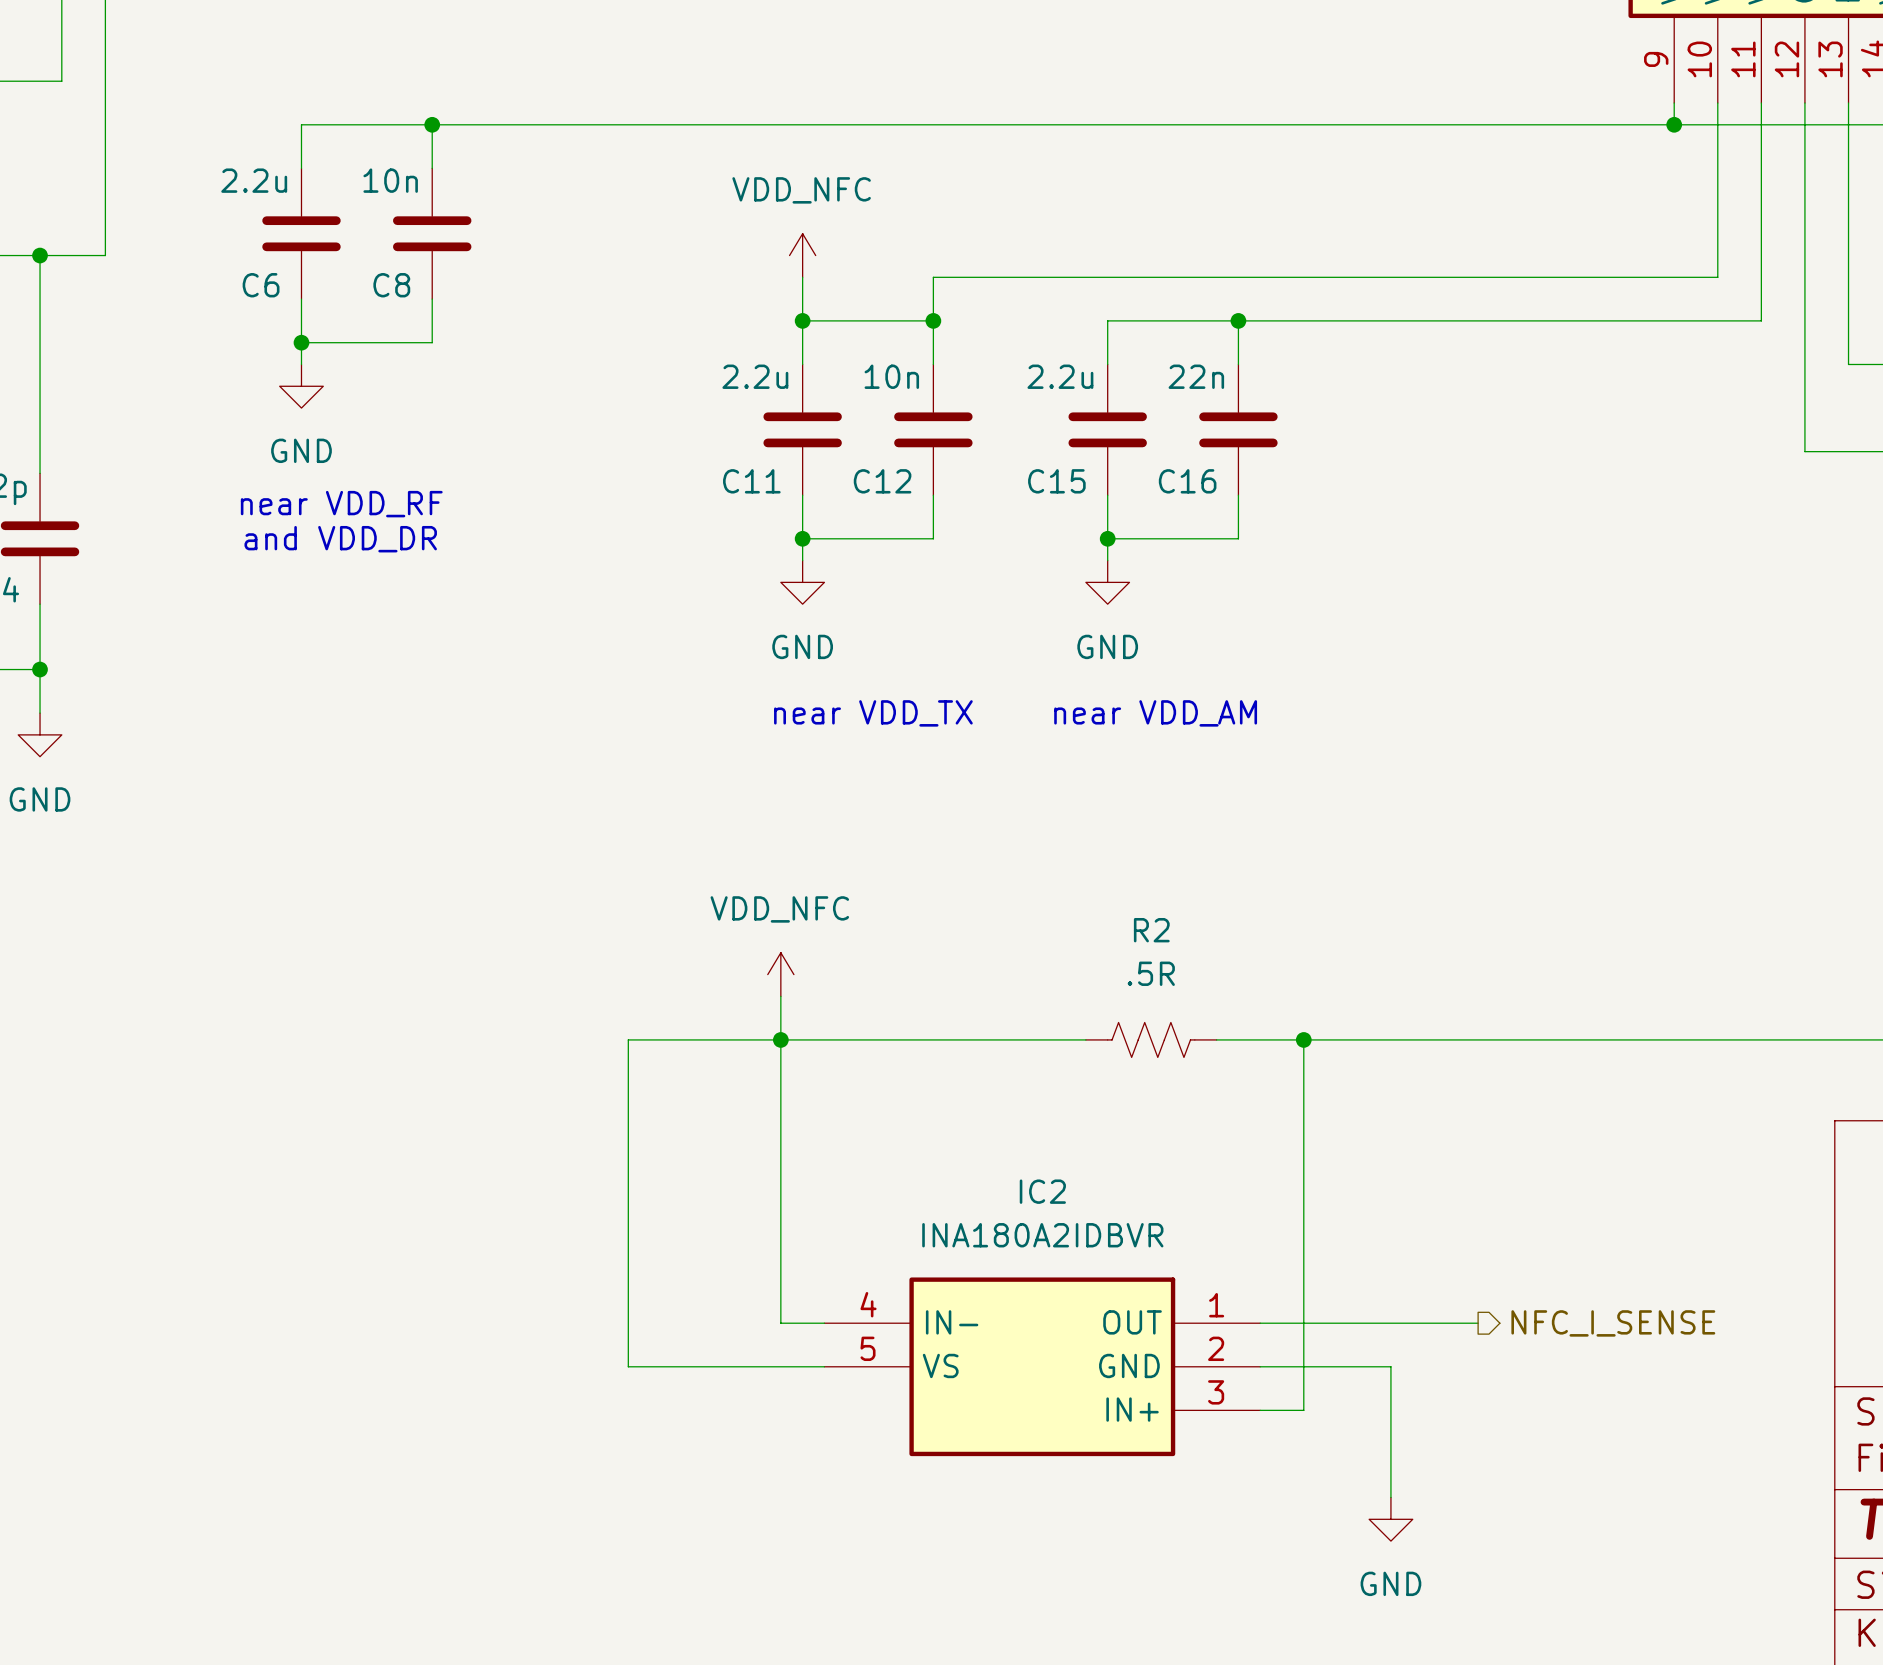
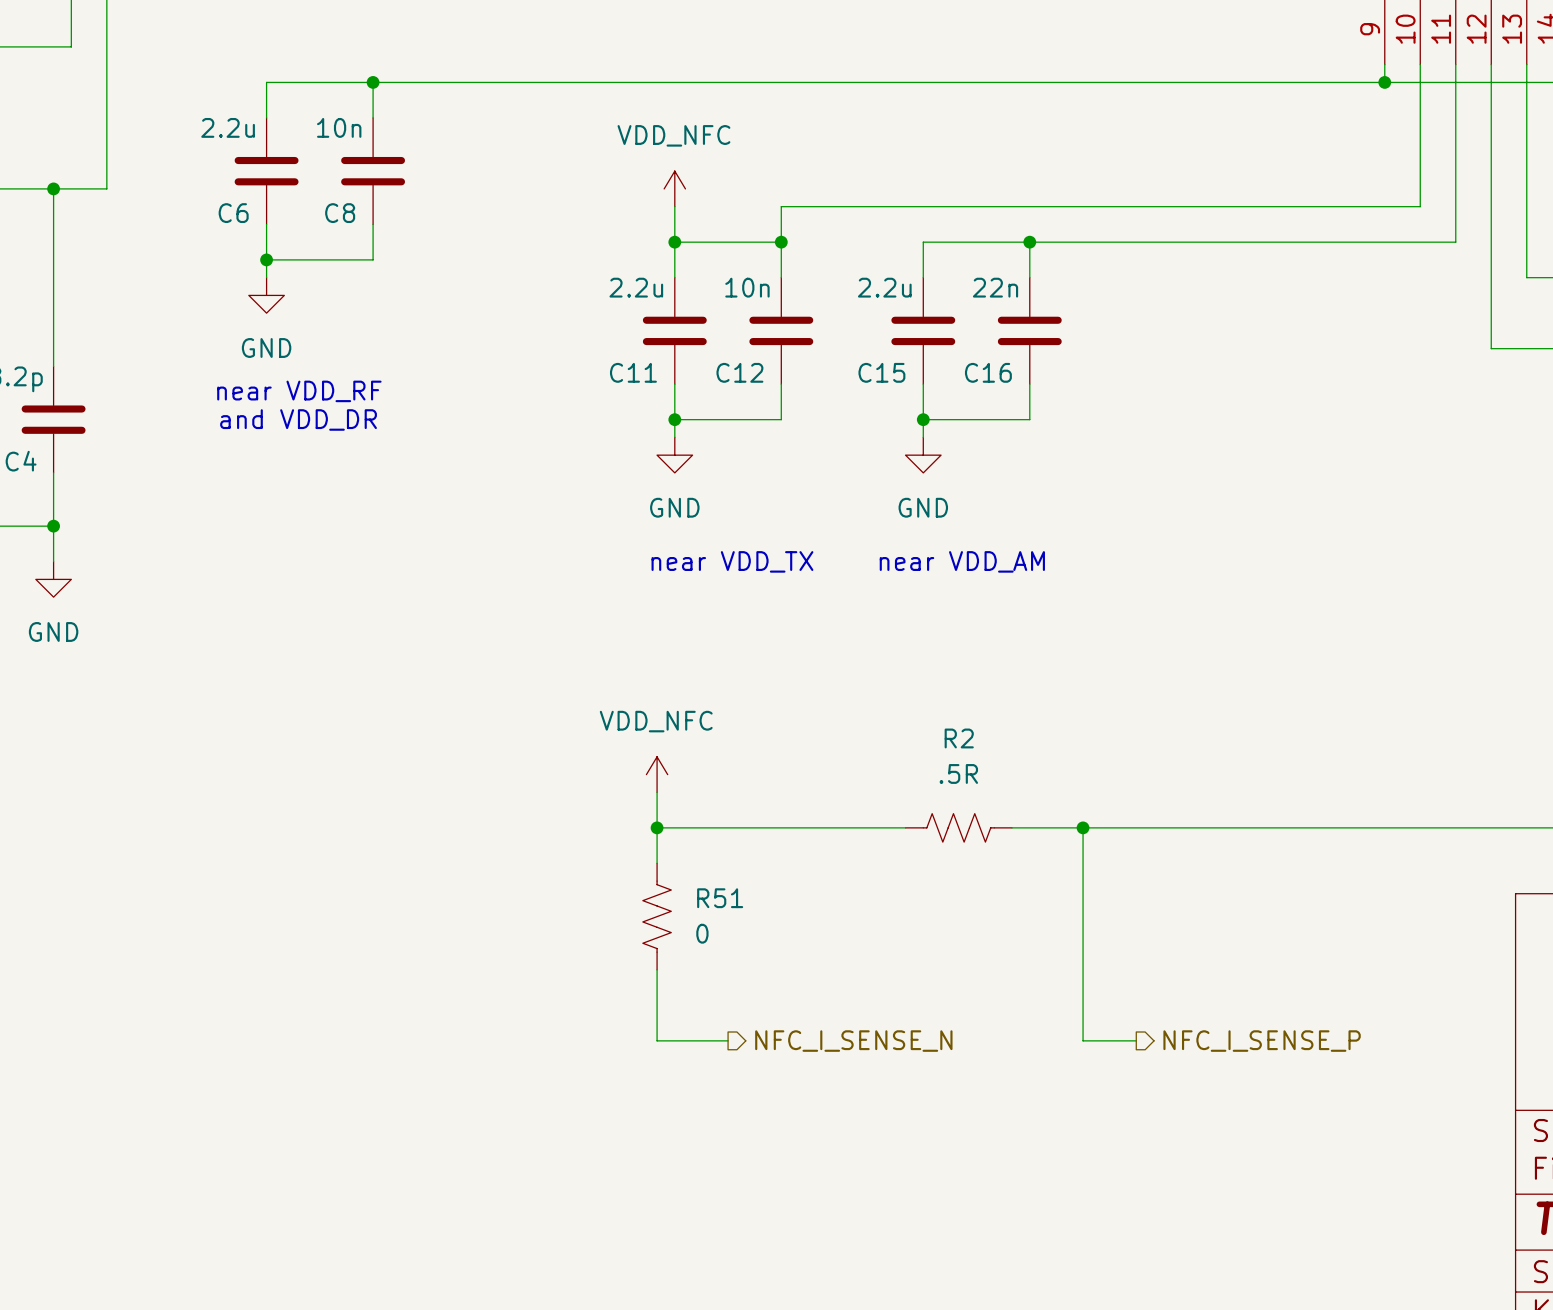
wire: (780, 1039) (628, 1039) (628, 1366) (824, 1366) -> none
wire: (780, 1083) (780, 1214) -> none
R51: none -> 0 (657, 916)
wire: (780, 1301) (780, 1323) (824, 1323) -> (657, 1040) (728, 1040)
hierarchical label: none -> NFC_I_SENSE_N (853, 1041)
wire: (1303, 1301) (1303, 1410) (1260, 1410) -> (1083, 1040) (1136, 1040)
wire: (1260, 1323) (1478, 1323) -> none
hierarchical label: NFC_I_SENSE (1613, 1323) -> NFC_I_SENSE_P (1262, 1041)
IC2: INA180A2IDBVR (1042, 1366) -> none
wire: (1260, 1366) (1390, 1366) (1390, 1497) -> none
power symbol: GND (1390, 1519) -> none

